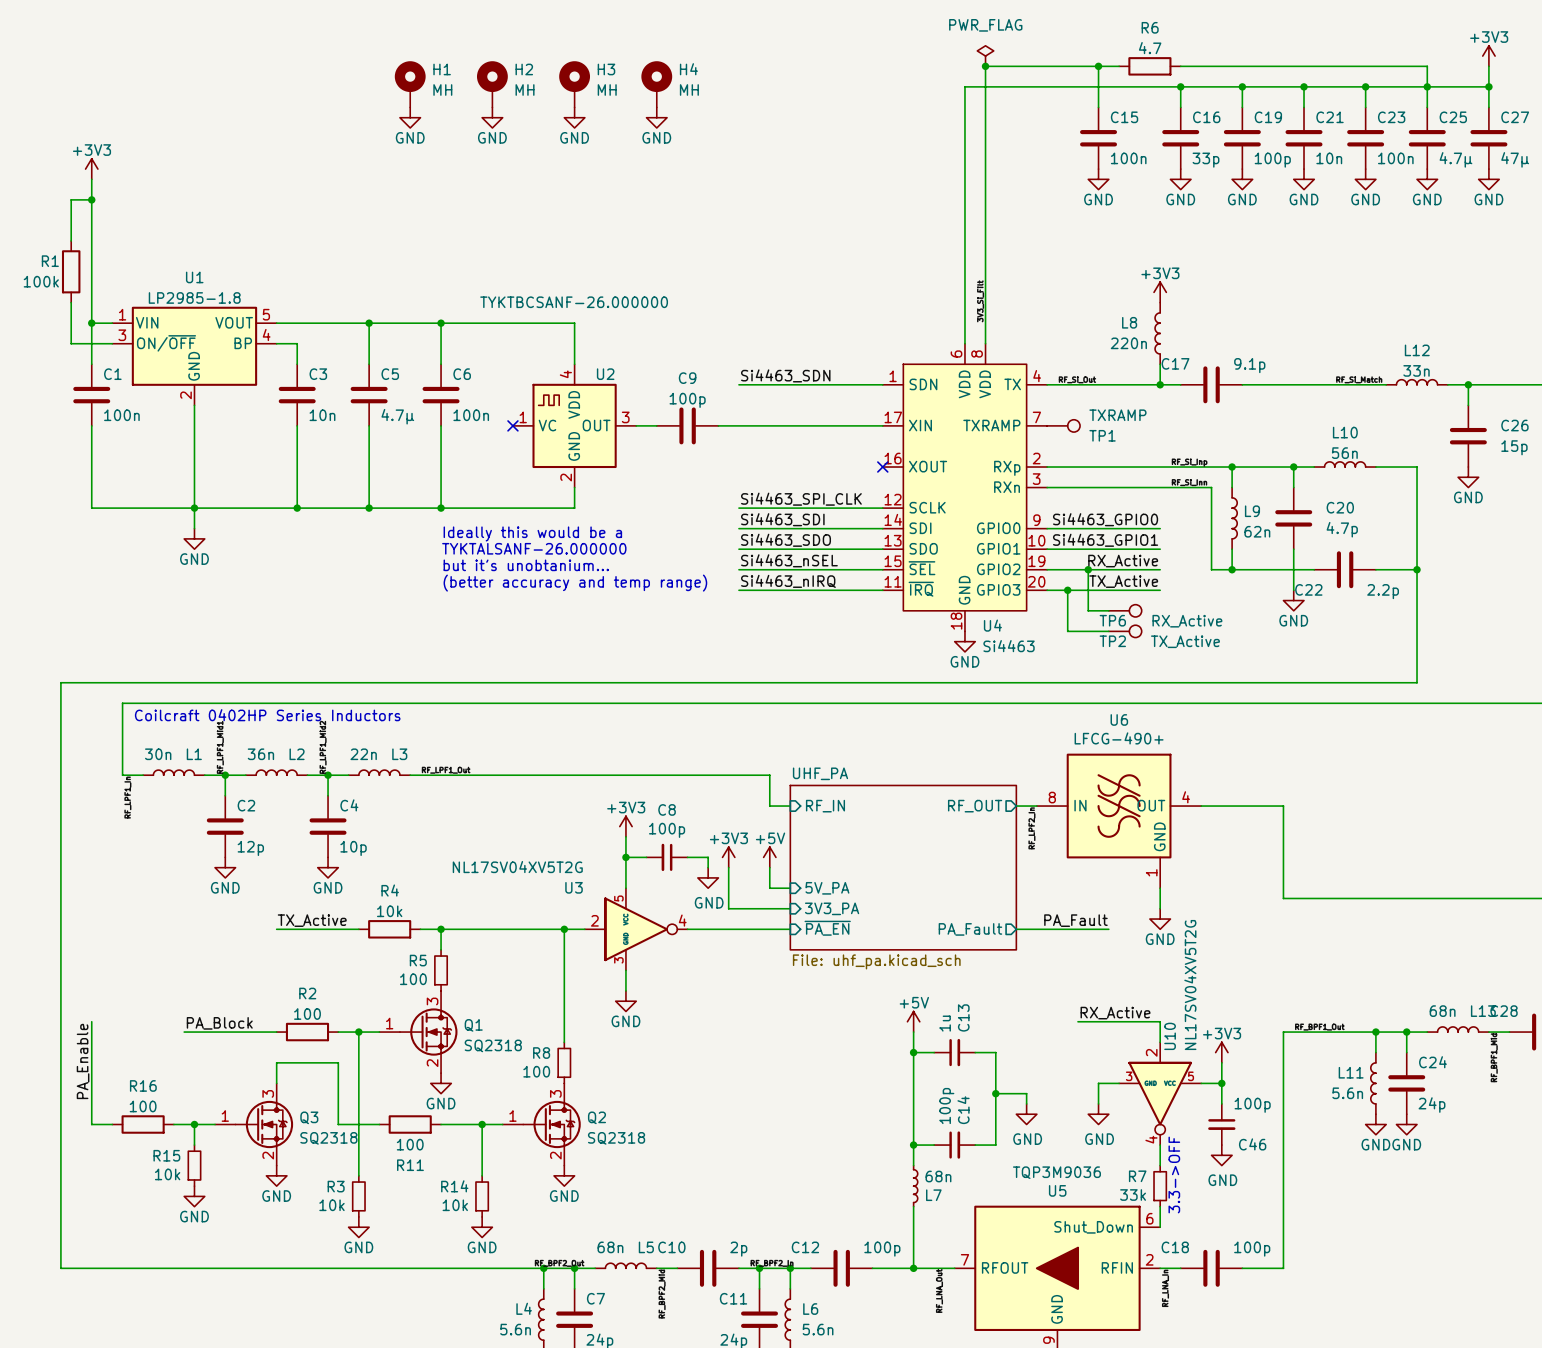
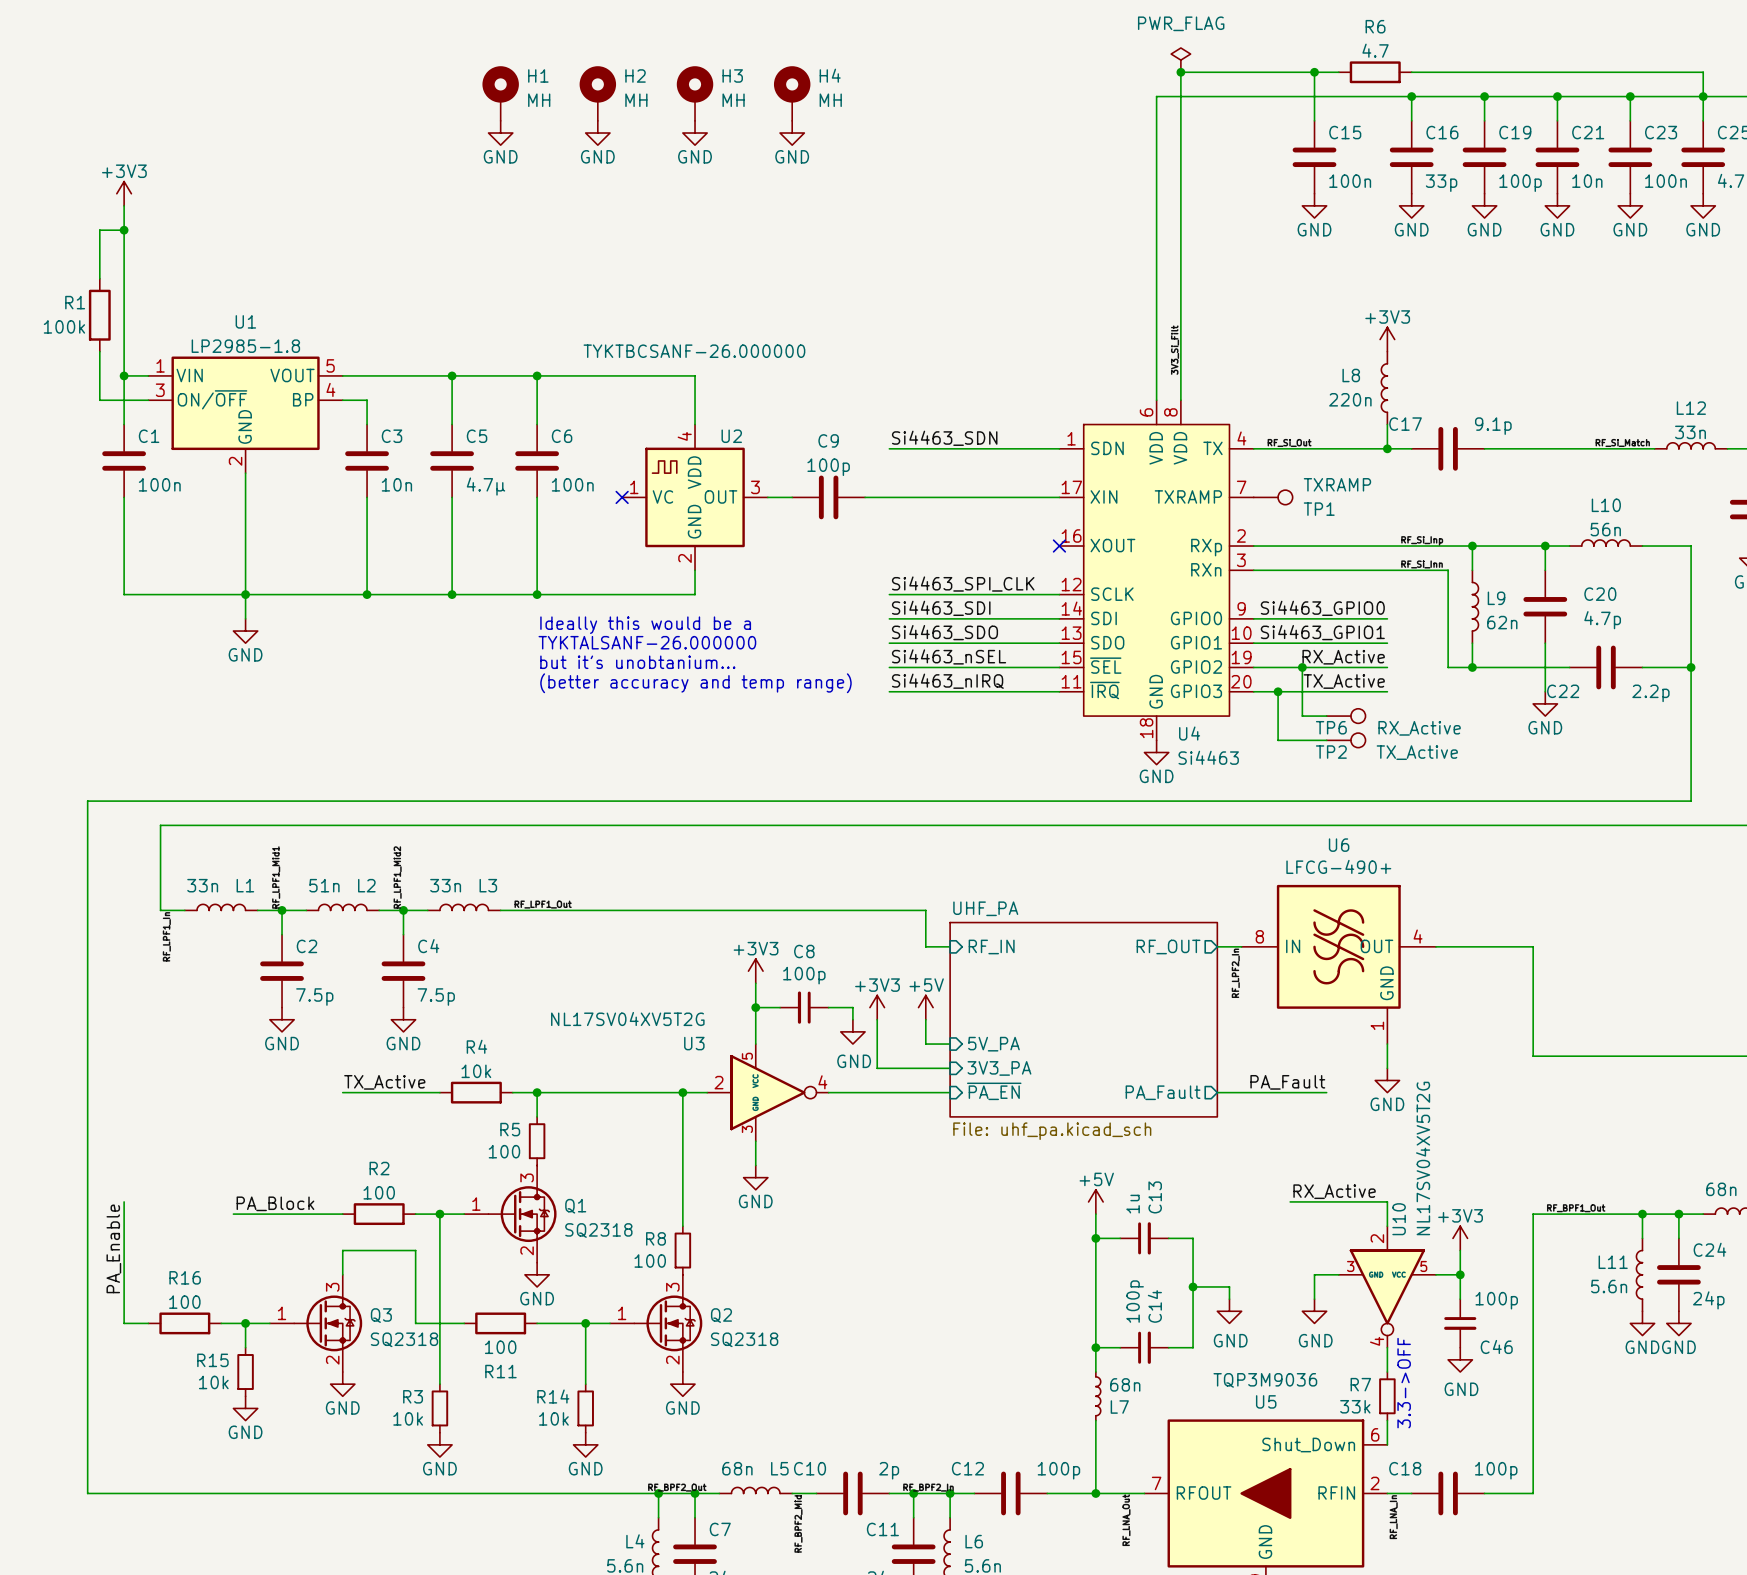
text: Coilcraft 0402HP Series Inductors (267, 715) -> none
L1 value: 30n (158, 754) -> 33n (202, 885)
L2 value: 36n (260, 754) -> 51n (324, 885)
L3 value: 22n (363, 754) -> 33n (445, 885)
C2 value: 12p (250, 848) -> 7.5p (314, 997)
C4 value: 10p (353, 848) -> 7.5p (436, 997)

